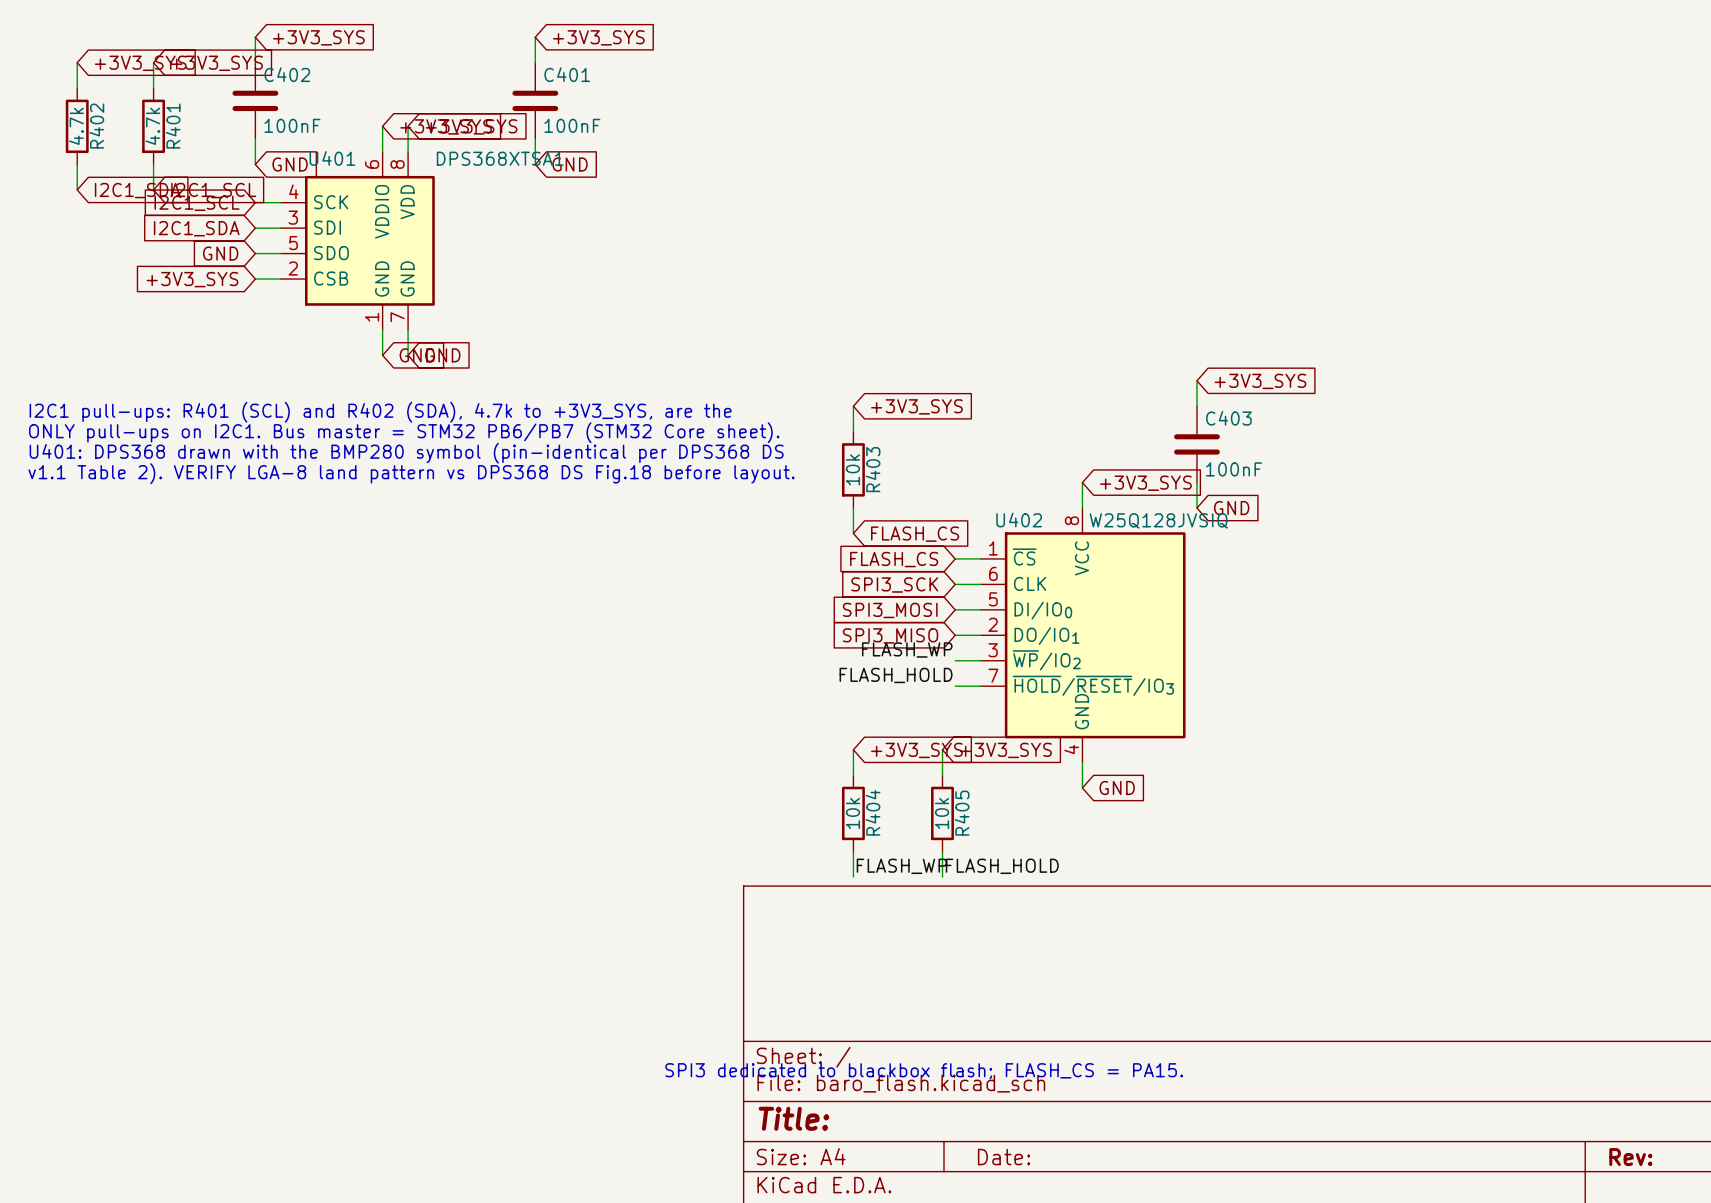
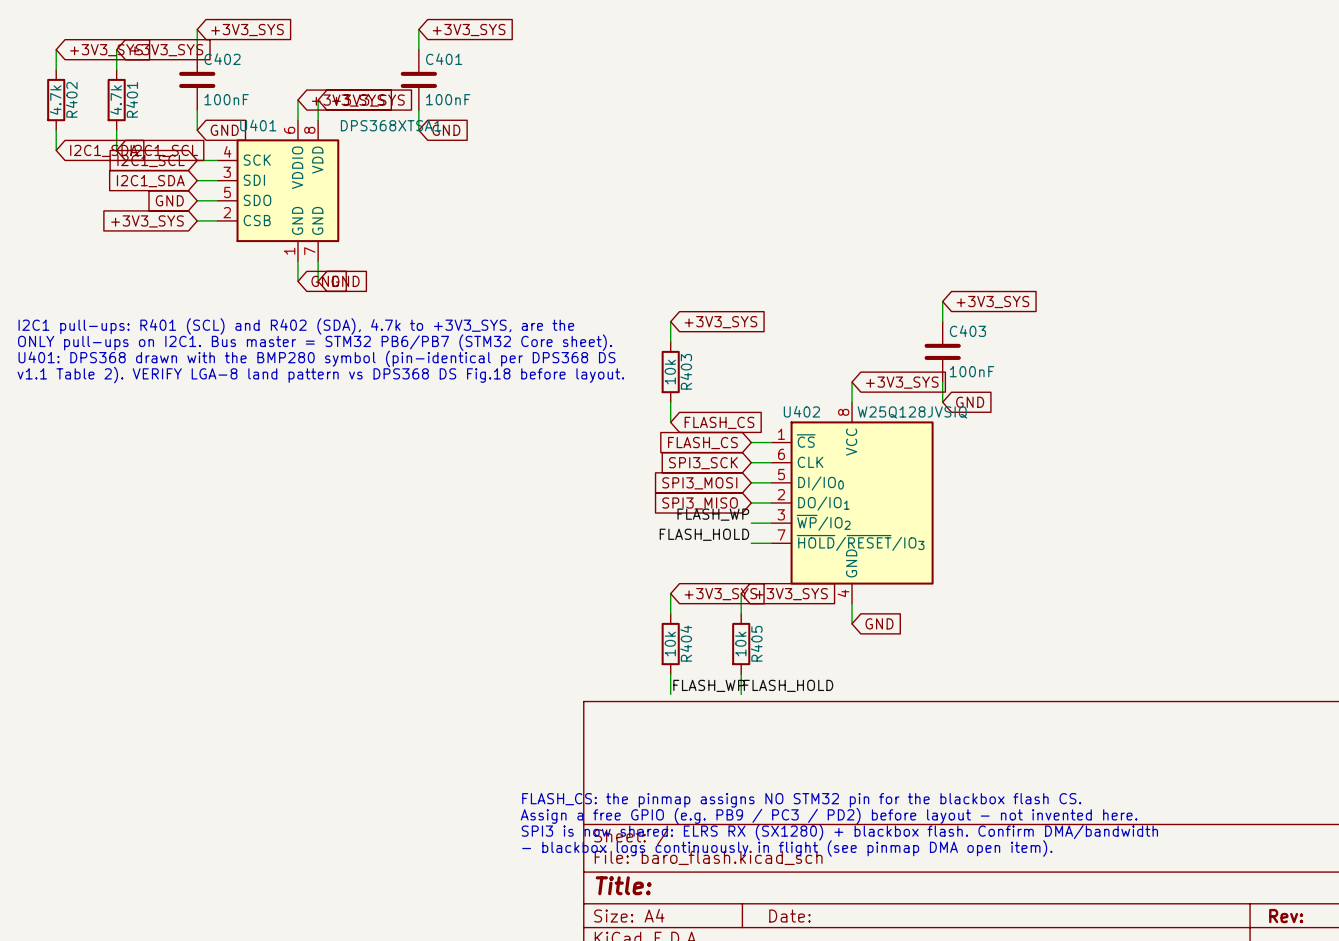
text: none -> FLASH_CS: the pinmap assigns NO STM32 pin for the blackbox flash CS. (801, 800)
text: none -> Assign a free GPIO (e.g. PB9 / PC3 / PD2) before layout - not invented here. (829, 816)
text: none -> SPI3 is now shared: ELRS RX (SX1280) + blackbox flash. Confirm DMA/bandwidth (839, 832)
text: SPI3 dedicated to blackbox flash; FLASH_CS = PA15. (924, 1071) -> - blackbox logs continuously in flight (see pinmap DMA open item). (787, 848)

